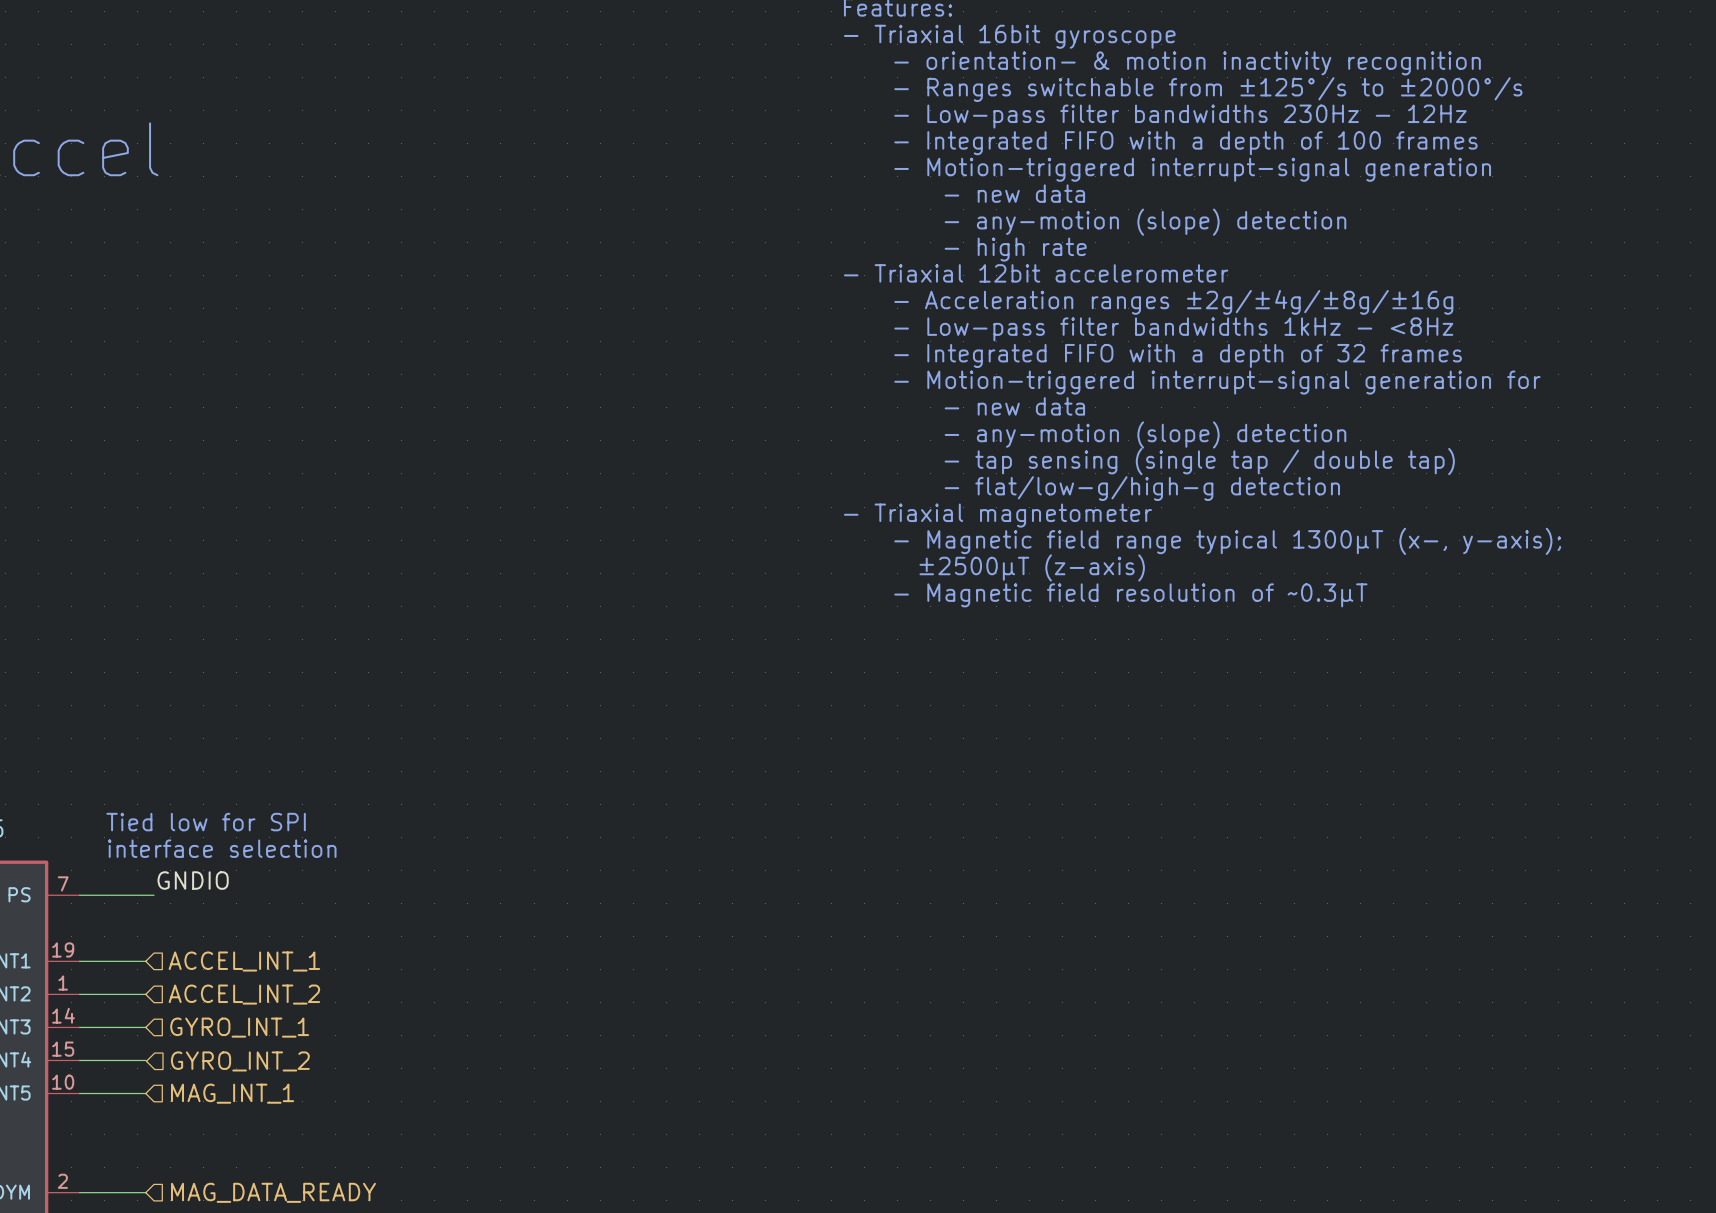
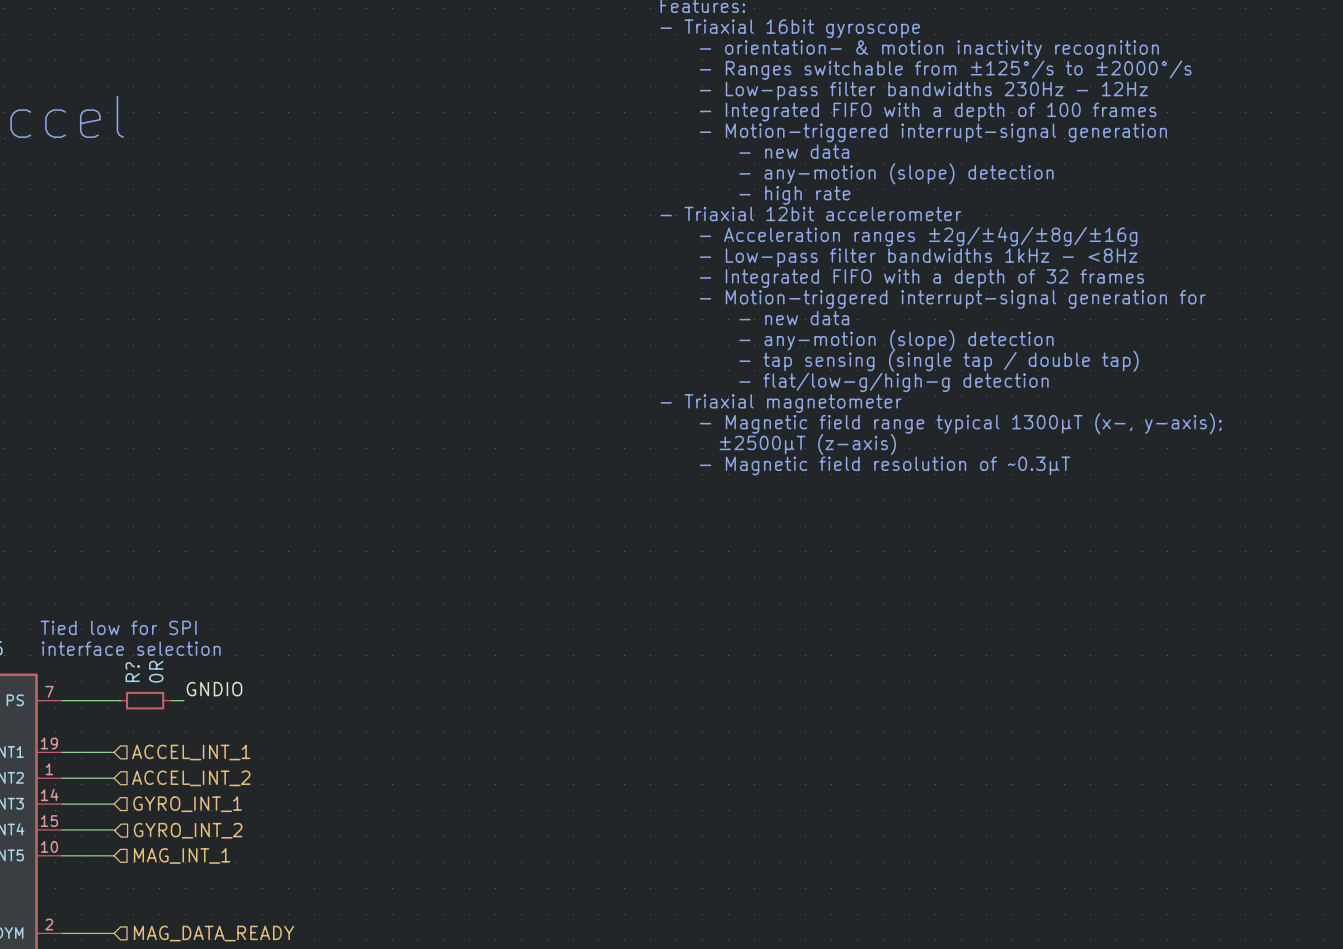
text position: Tied low for SPI (206, 822) -> Tied low for SPI (118, 627)
text position: interface selection (222, 848) -> interface selection (131, 648)
label position: GNDIO (193, 880) -> GNDIO (214, 689)
R?: none -> 0R (145, 700)
wire: none -> (170, 700) (183, 700)

